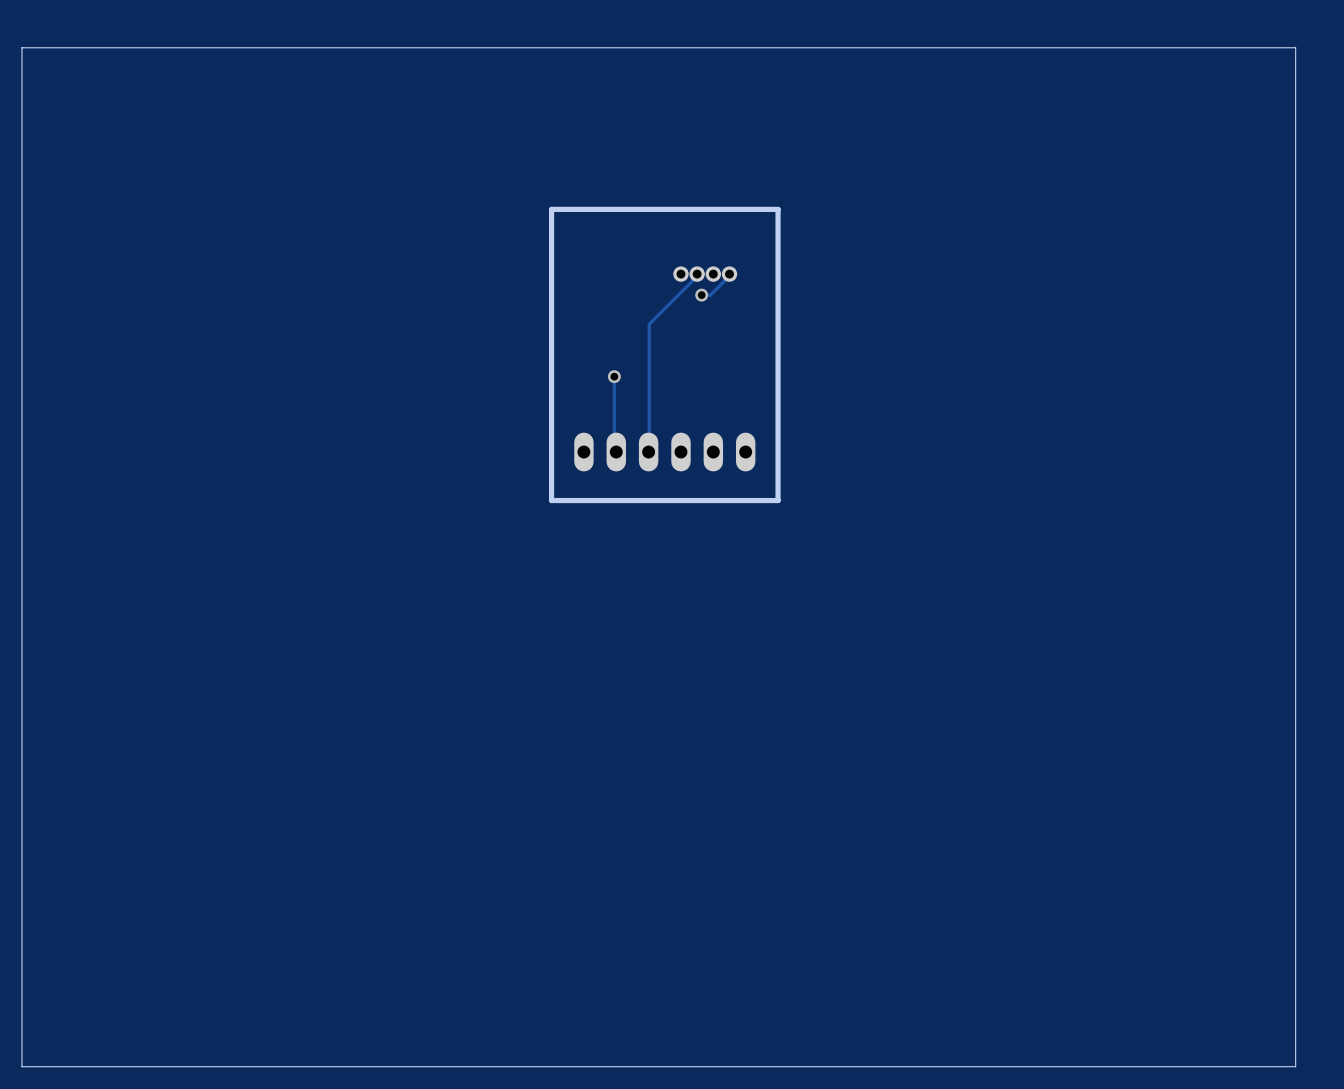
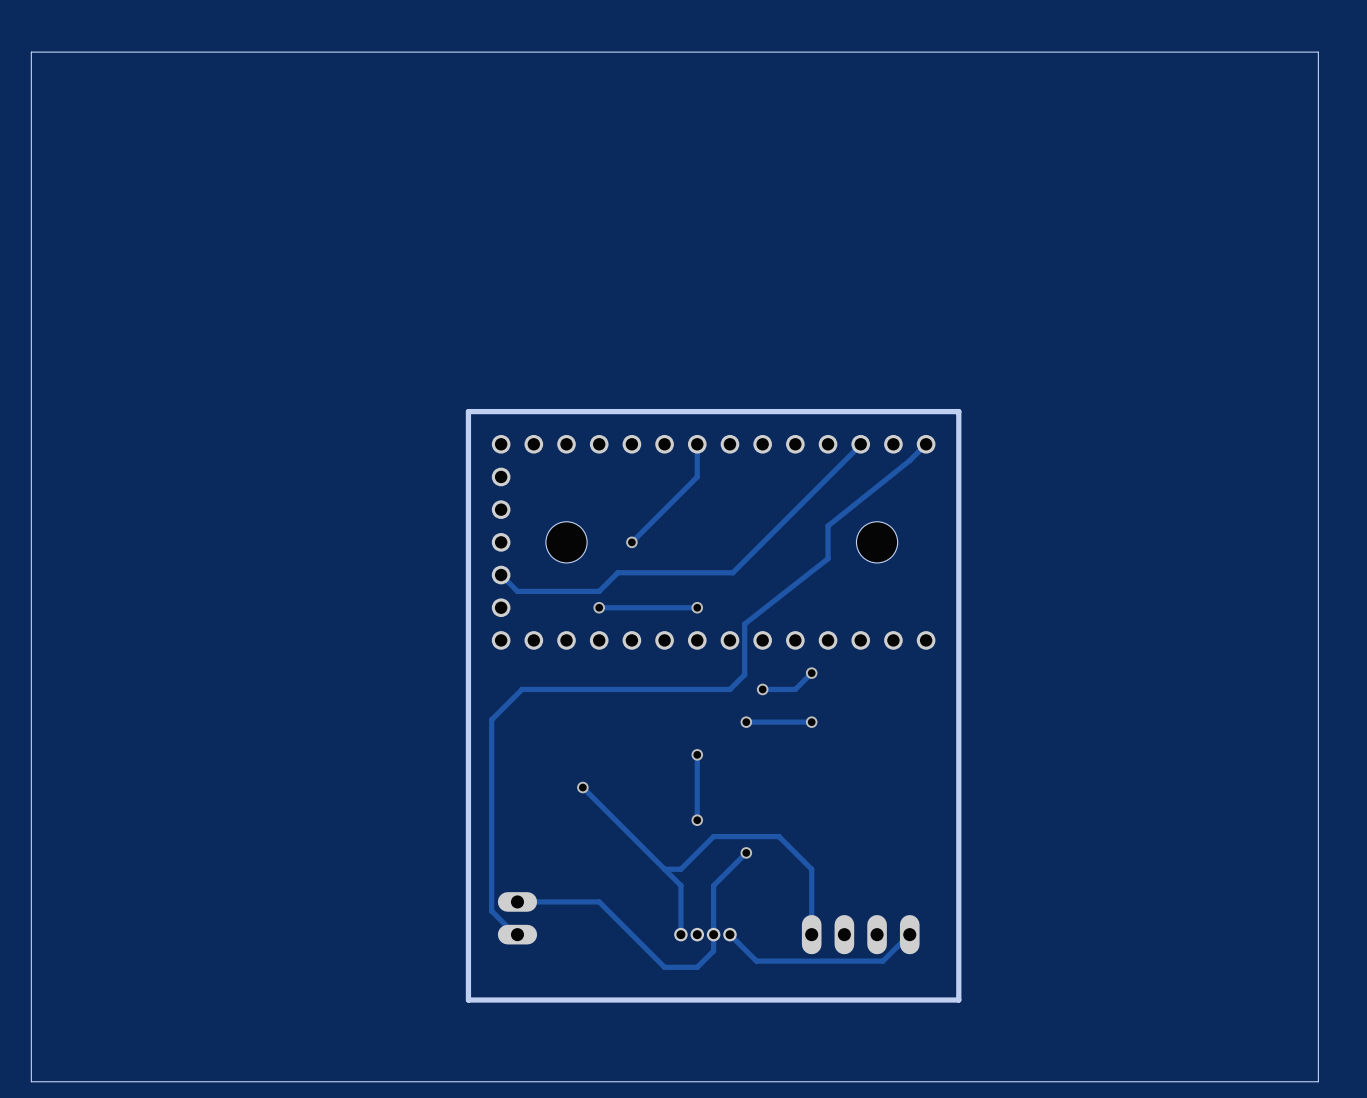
board edge: (778, 209) (551, 209) (551, 500) (778, 500) (778, 209) -> none
track: (697, 274) (698, 274) (649, 324) (649, 452) -> none
part: (705, 274) -> none
track: (729, 274) (710, 295) (701, 295) -> none
via: (701, 295) -> none
track: (614, 376) (614, 449) (616, 452) -> none
via: (614, 376) -> none
board edge: none -> (958, 411) (468, 411) (468, 1000) (958, 1000) (958, 411)
track: none -> (697, 444) (697, 476) (631, 542)
track: none -> (860, 444) (732, 572) (617, 572) (599, 591) (517, 591) (501, 575)
track: none -> (926, 444) (909, 460) (828, 526) (828, 558) (744, 624) (744, 674) (729, 689) (522, 689) (491, 719) (491, 911) (515, 934) (517, 934)
part: (664, 452) -> none
hole: none -> (566, 542)
via: none -> (631, 542)
part: none -> (713, 542)
hole: none -> (877, 542)
via: none -> (599, 607)
track: none -> (697, 607) (599, 607)
via: none -> (697, 607)
track: none -> (811, 673) (795, 689) (762, 689)
via: none -> (811, 673)
via: none -> (762, 689)
via: none -> (746, 722)
track: none -> (811, 722) (746, 722)
via: none -> (811, 722)
track: none -> (697, 754) (697, 820)
via: none -> (697, 754)
track: none -> (582, 787) (680, 885) (680, 934)
via: none -> (582, 787)
via: none -> (697, 820)
track: none -> (746, 852) (713, 885) (713, 950) (697, 967) (664, 967) (599, 901) (517, 901)
via: none -> (746, 852)
track: none -> (664, 869) (680, 869) (713, 836) (779, 836) (811, 869) (811, 934)
part: none -> (517, 918)
part: none -> (705, 934)
part: none -> (860, 934)
track: none -> (909, 934) (882, 961) (756, 961) (729, 934)

